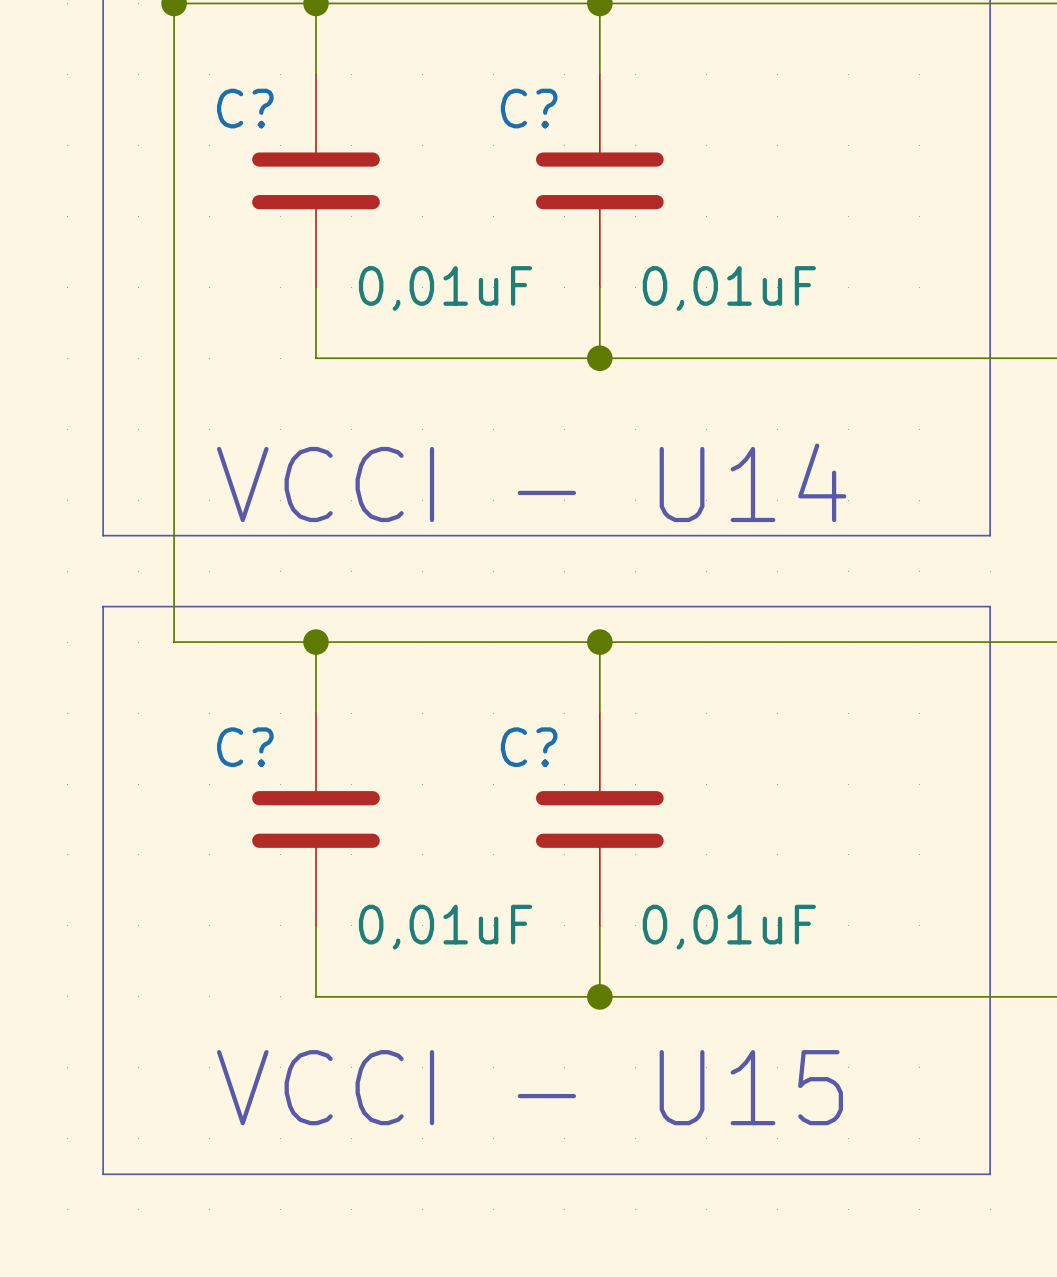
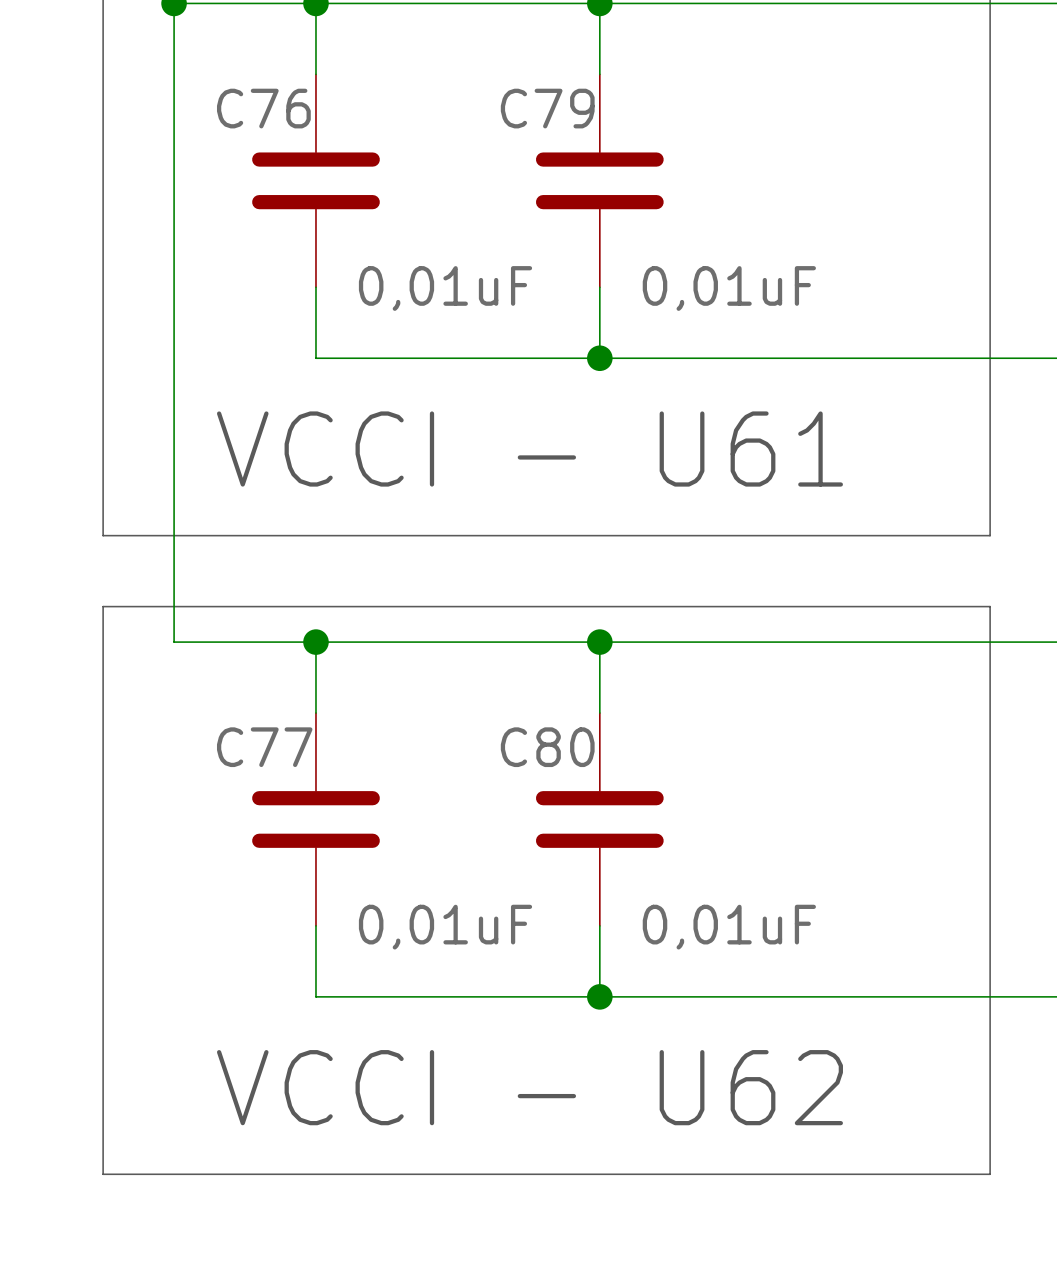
C? name: C? (245, 108) -> C76 (263, 108)
C? name: C? (529, 108) -> C79 (547, 108)
text: VCCI - U14 (531, 482) -> VCCI - U61 (529, 449)
C? name: C? (245, 747) -> C77 (264, 747)
C? name: C? (529, 747) -> C80 (547, 747)
text: VCCI - U15 (529, 1087) -> VCCI - U62 (529, 1087)

